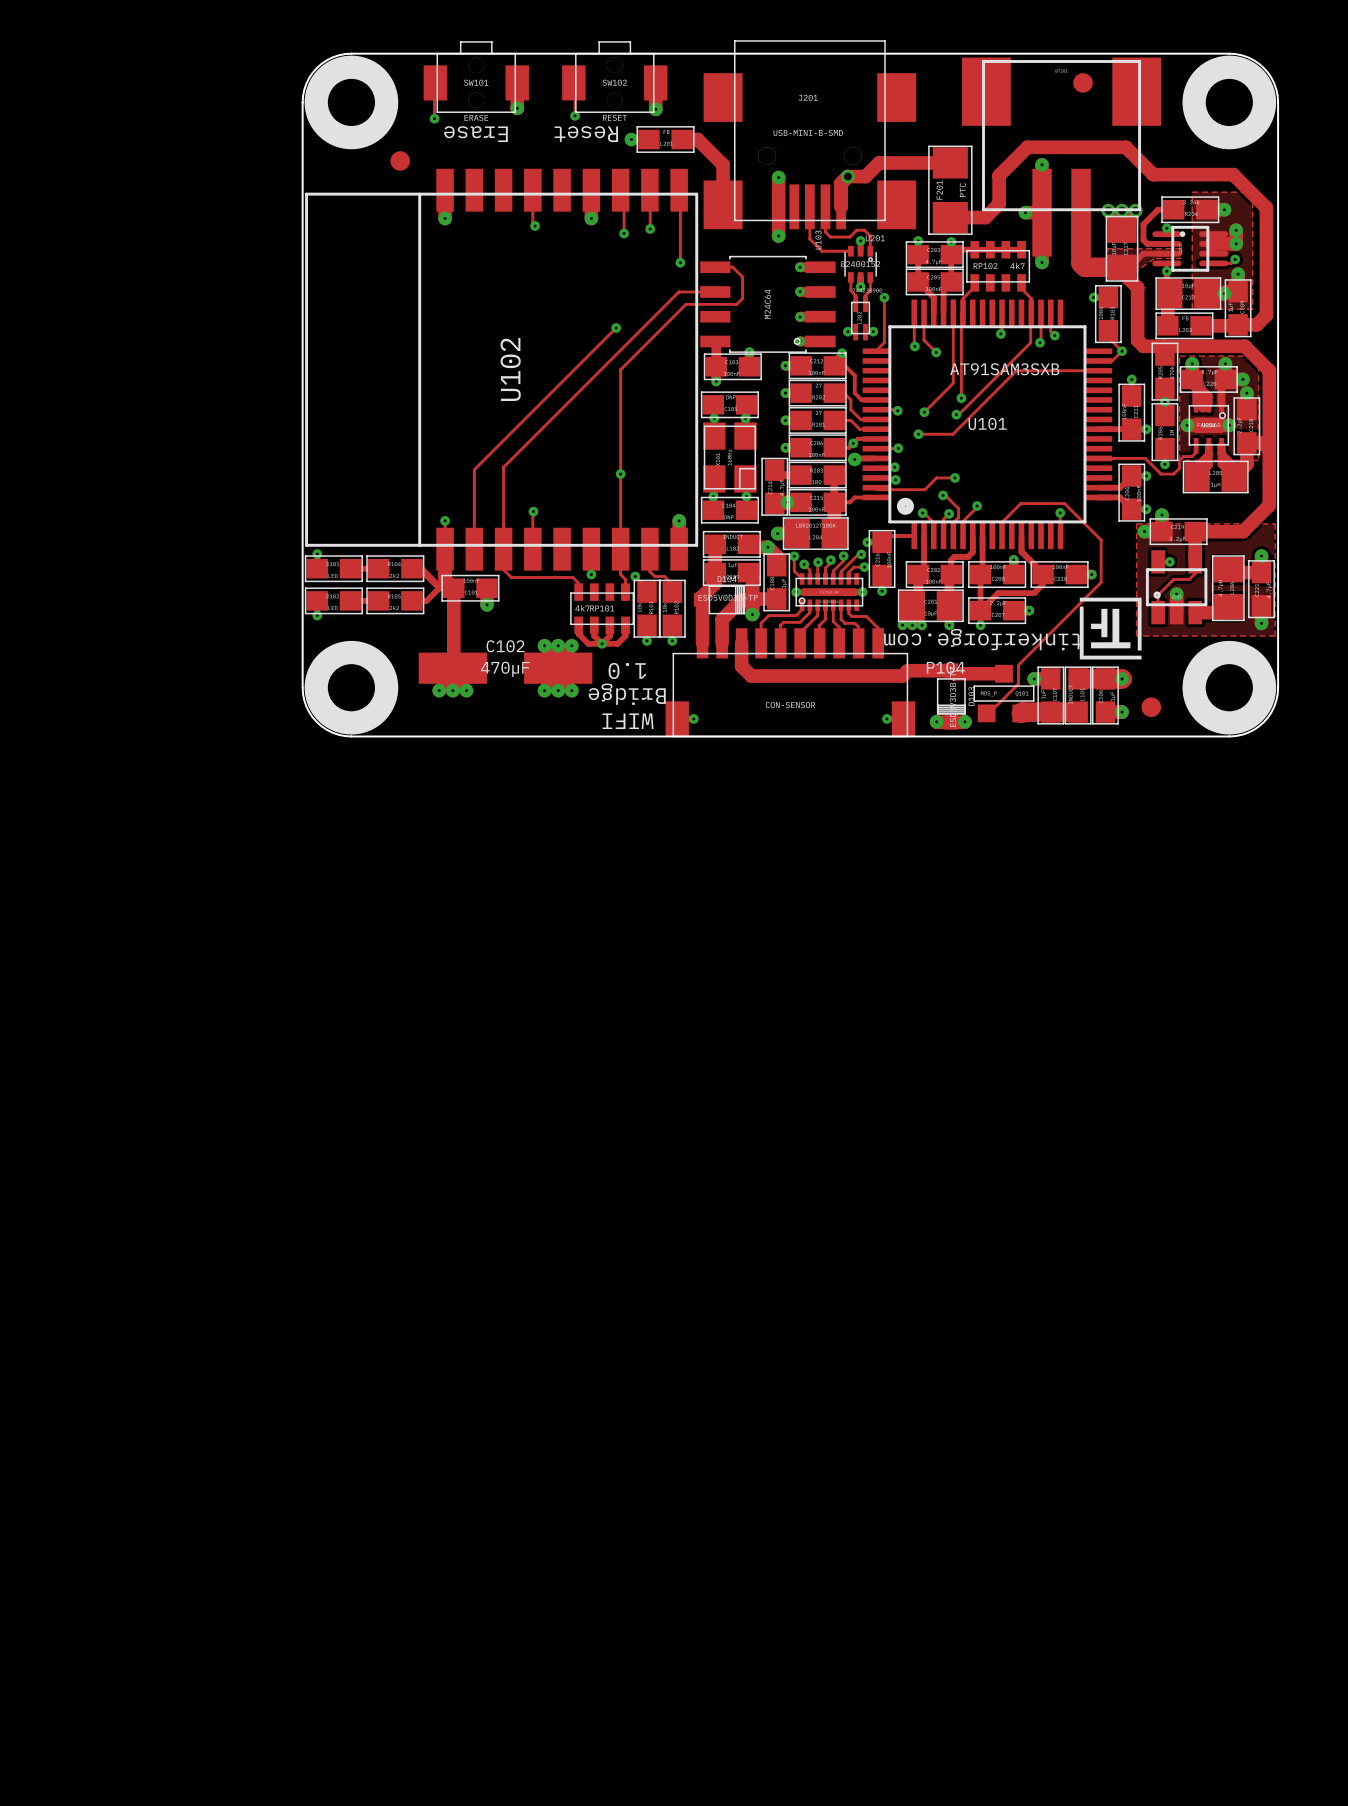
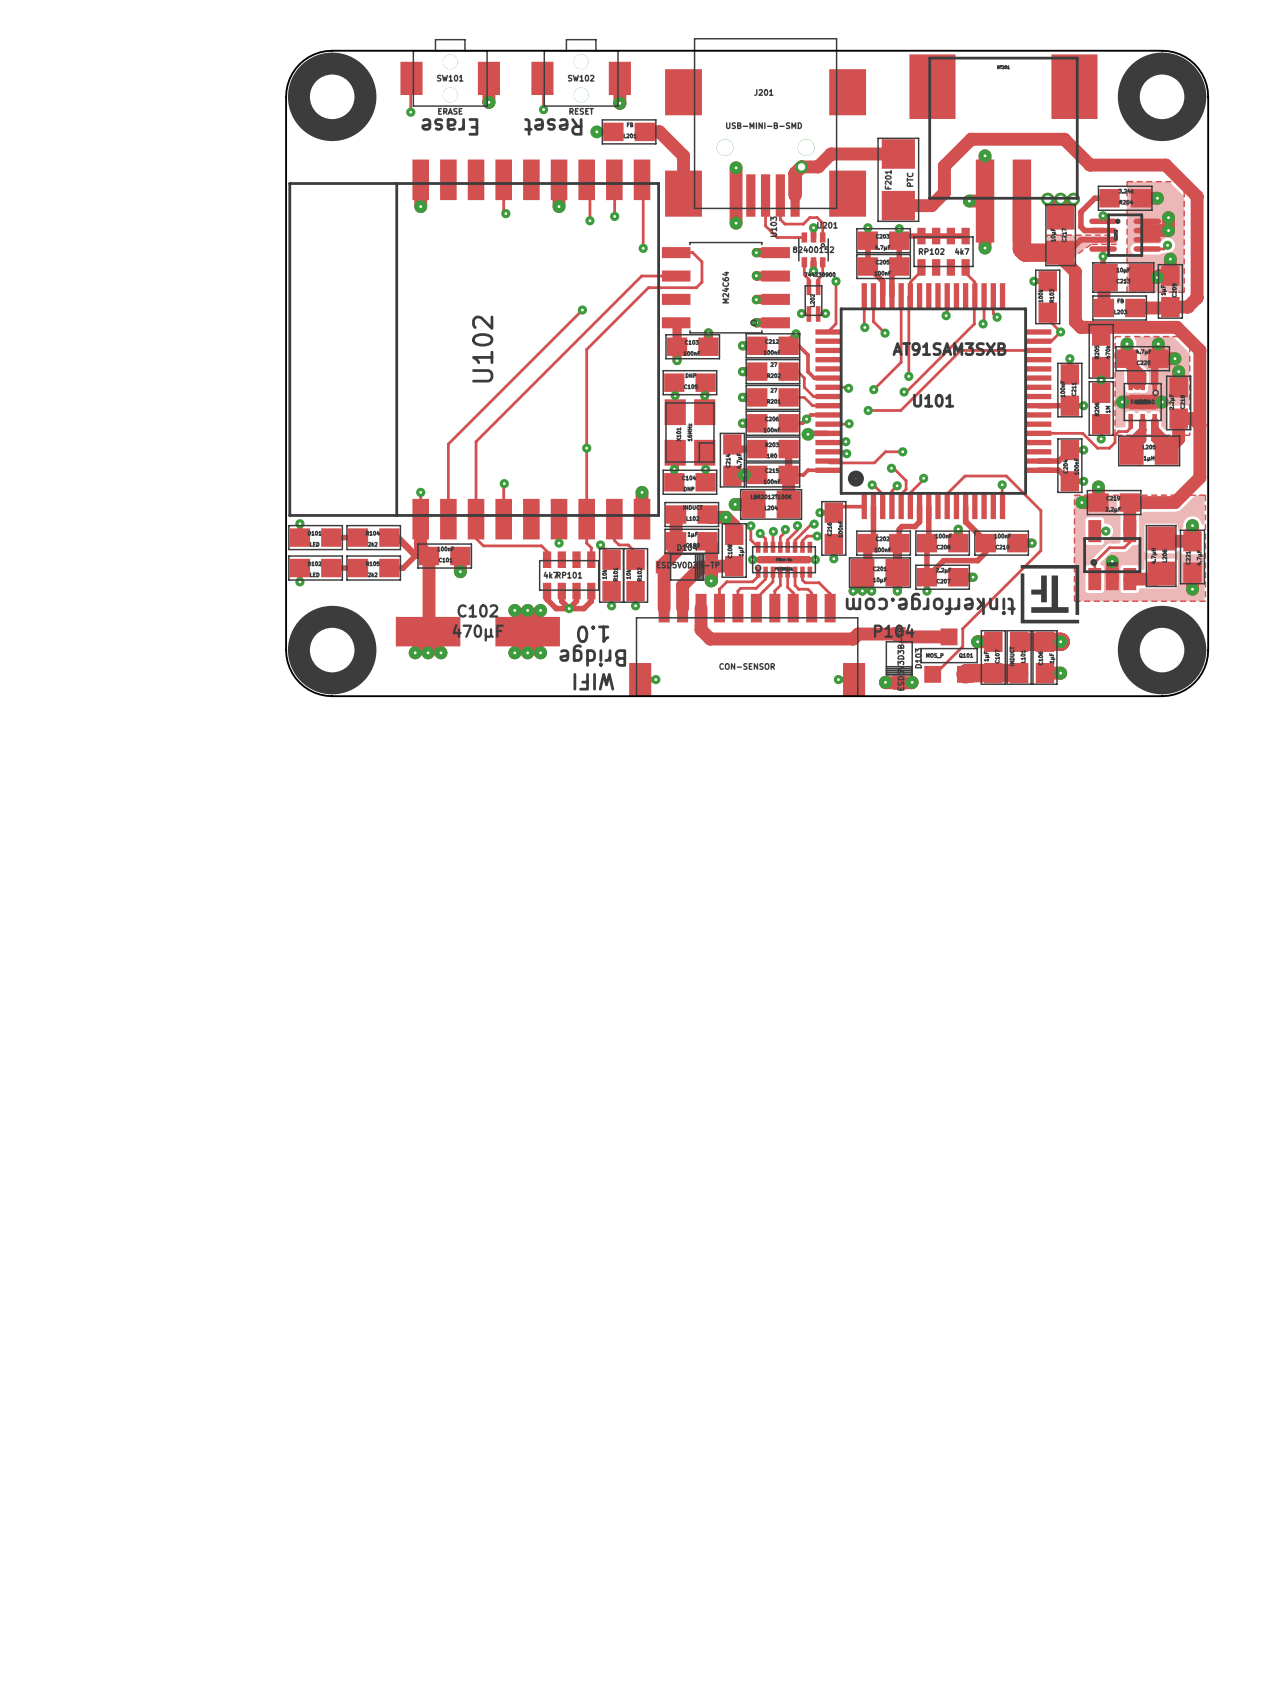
part: (1083, 82) -> none
part: (400, 160) -> none
part: (1151, 707) -> none

